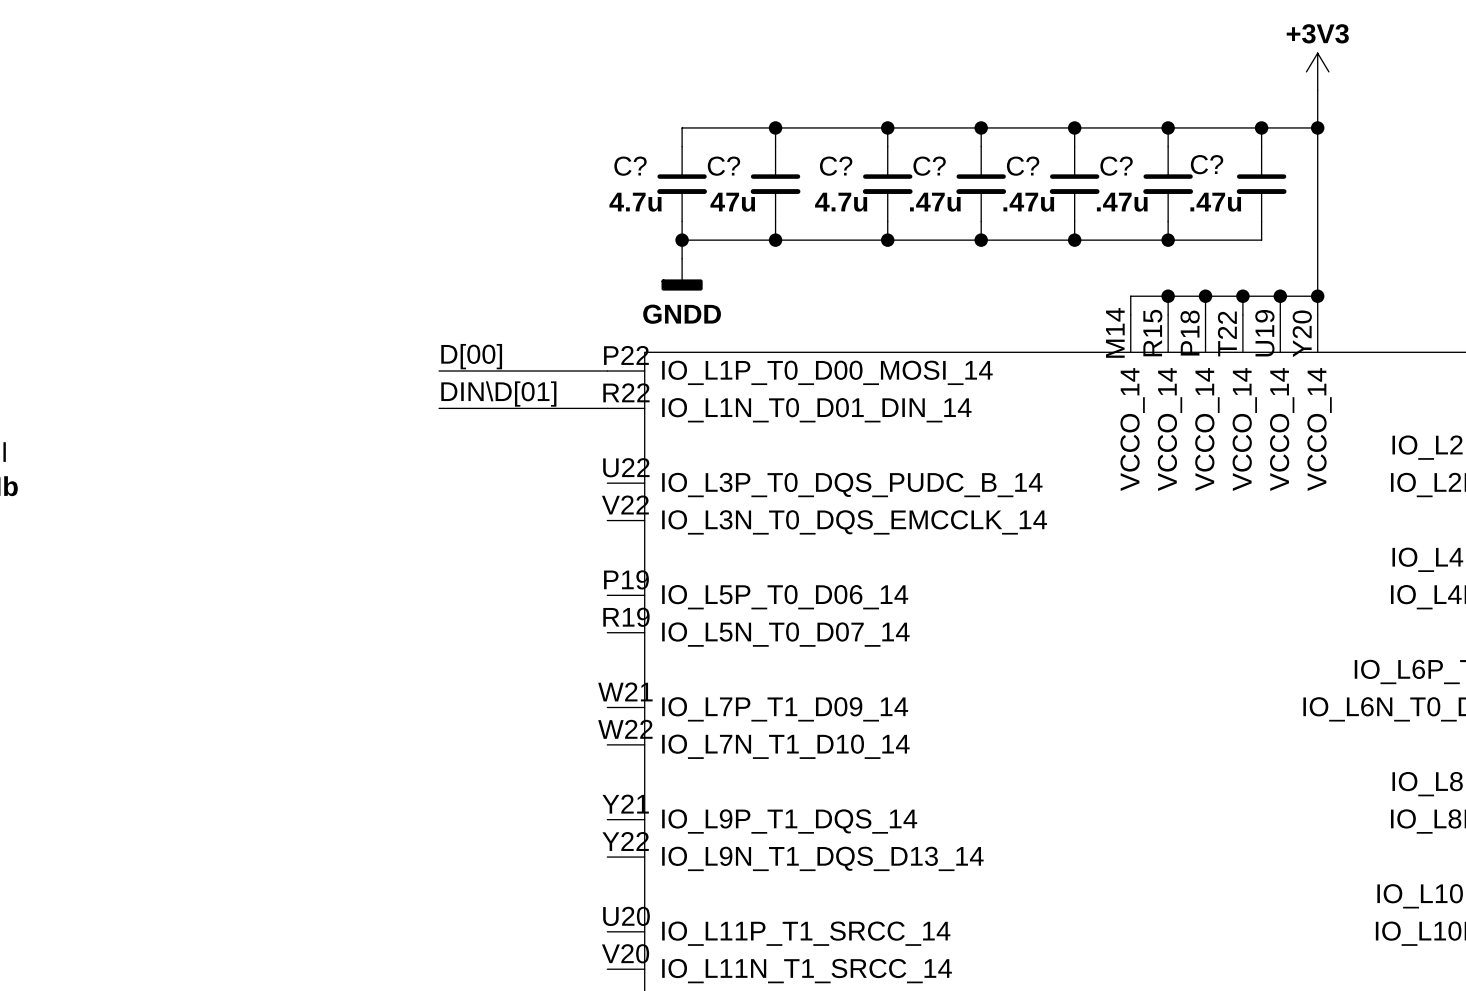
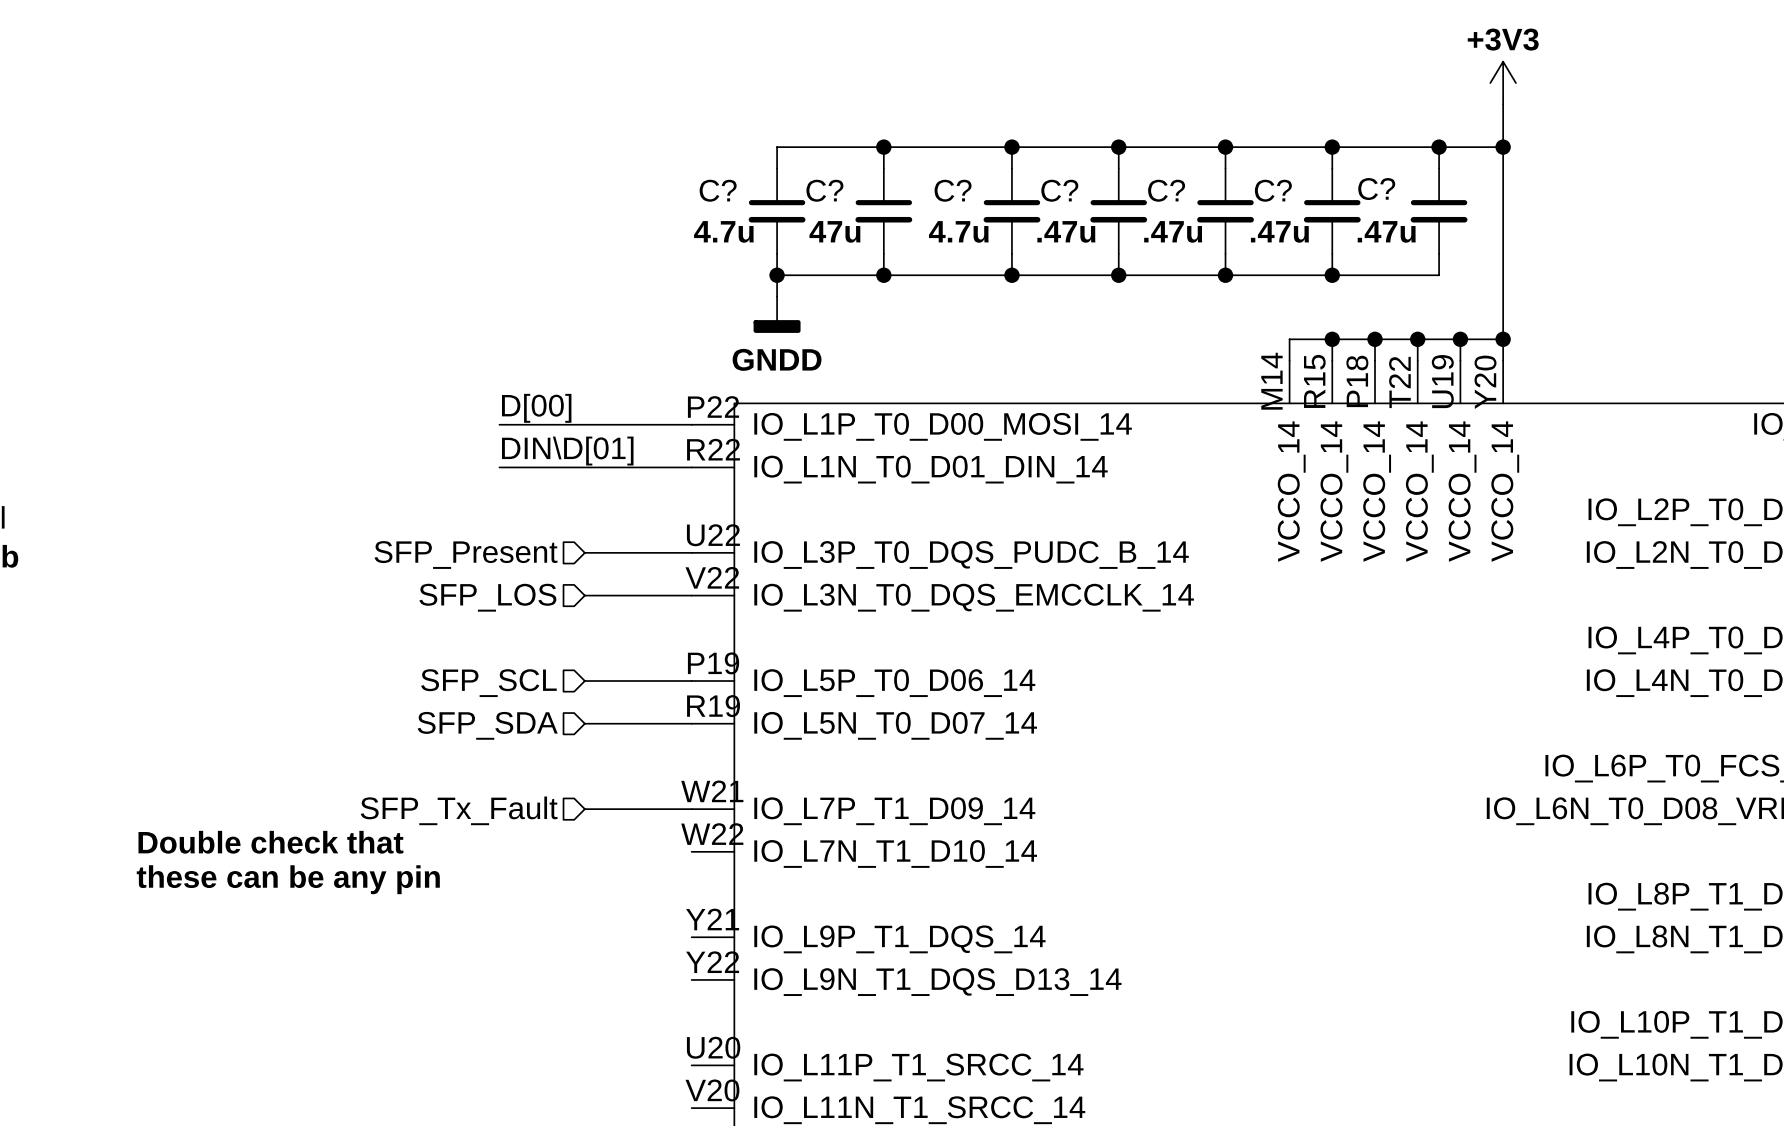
wire: none -> (584, 552) (691, 552)
hierarchical label: none -> SFP_Present (466, 555)
wire: none -> (584, 595) (691, 595)
hierarchical label: none -> SFP_LOS (487, 597)
wire: none -> (584, 681) (691, 681)
hierarchical label: none -> SFP_SCL (488, 683)
wire: none -> (584, 723) (691, 723)
hierarchical label: none -> SFP_SDA (487, 725)
wire: none -> (584, 809) (691, 809)
hierarchical label: none -> SFP_Tx_Fault (459, 810)
text: none -> Double check that (270, 842)
text: none -> these can be any pin (288, 879)

